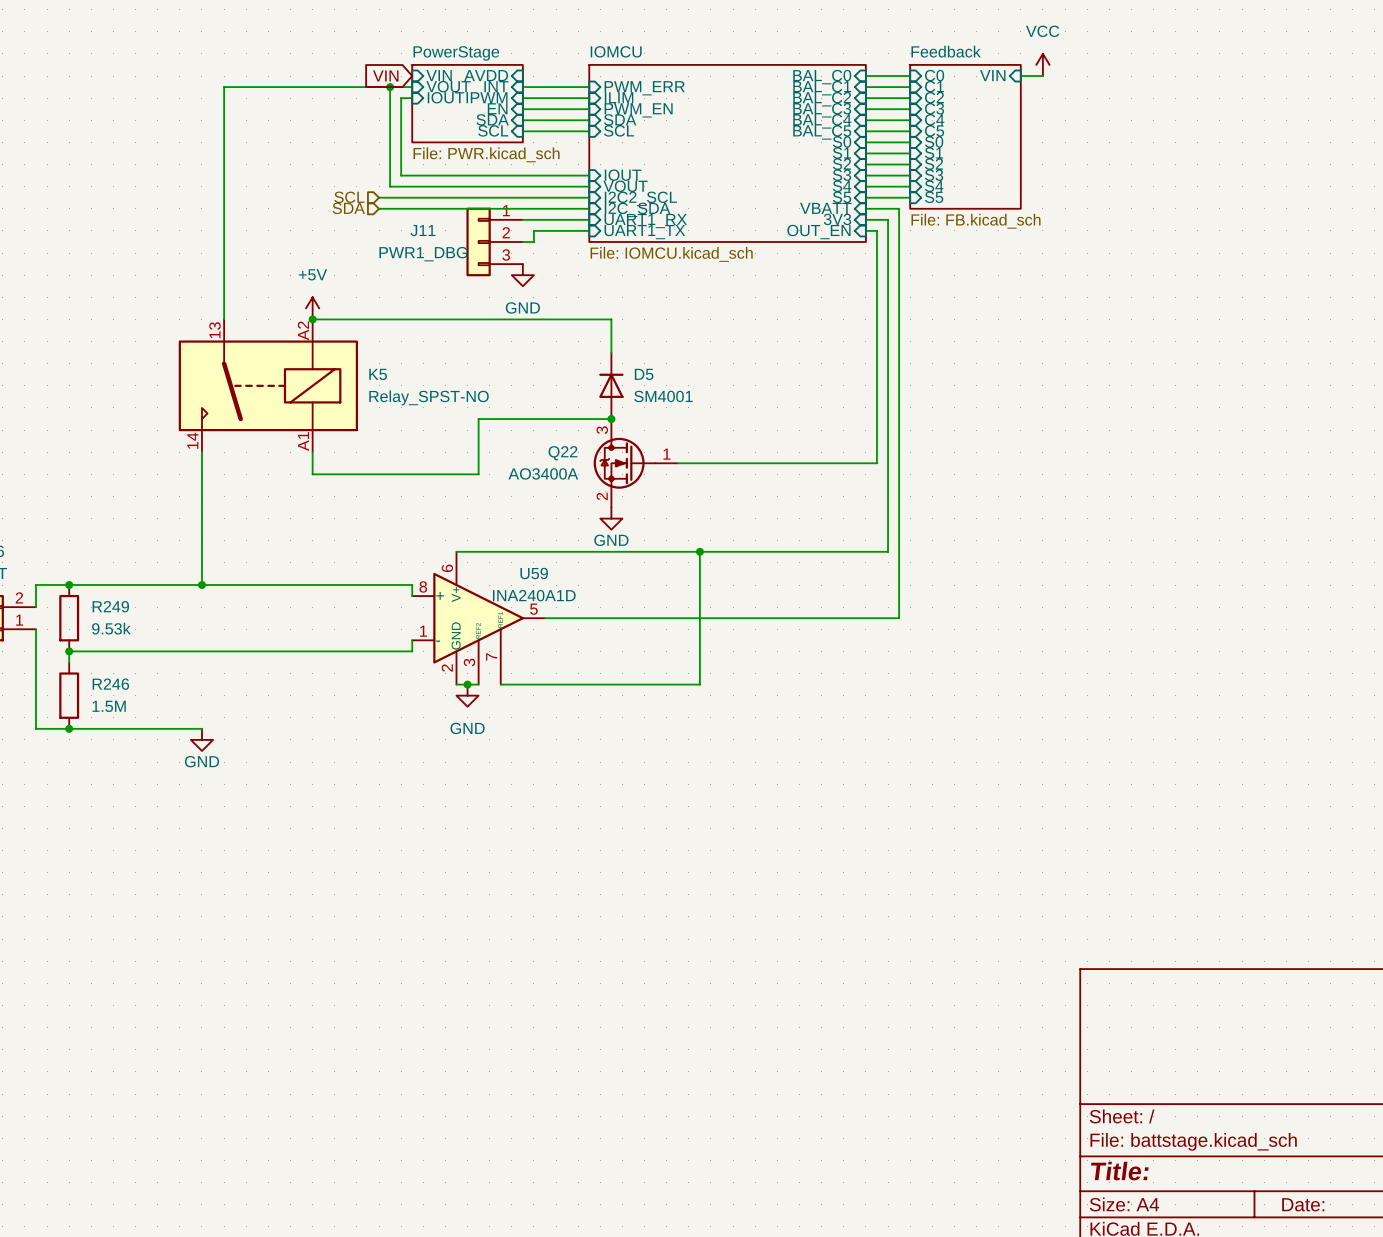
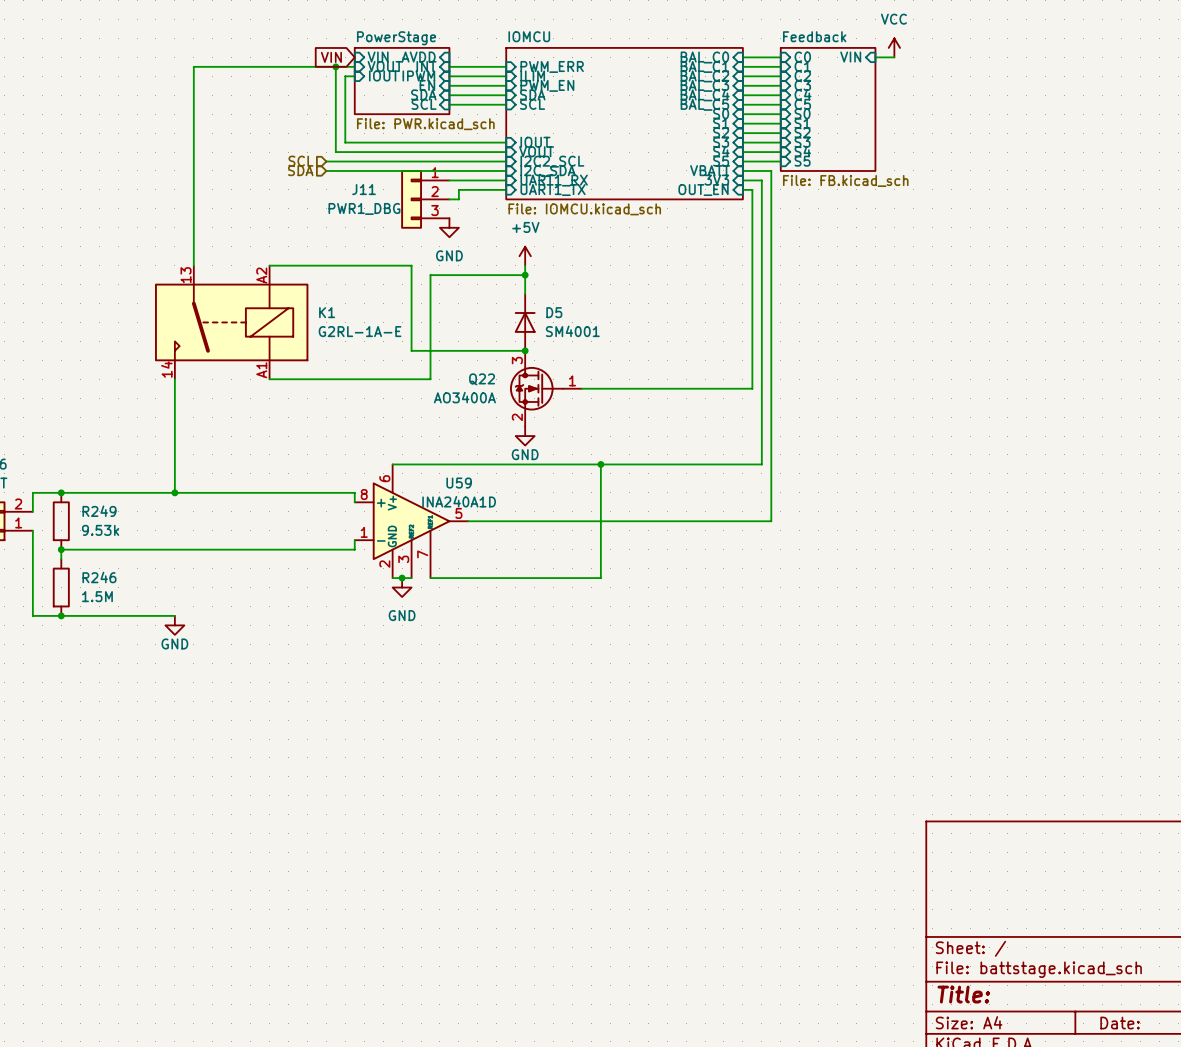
power symbol: +5V (312, 308) -> none
power symbol: none -> +5V (525, 256)
junction: (312, 319) -> none
wire: (478, 319) (611, 319) -> (411, 265) (411, 350)
junction: none -> (525, 275)
K5 name: K5 (378, 374) -> K1 (327, 312)
K5 value: Relay_SPST-NO (429, 397) -> G2RL-1A-E (360, 331)
wire: (478, 419) (478, 474) (312, 474) (312, 452) -> (525, 275) (430, 275) (430, 379) (269, 379)

